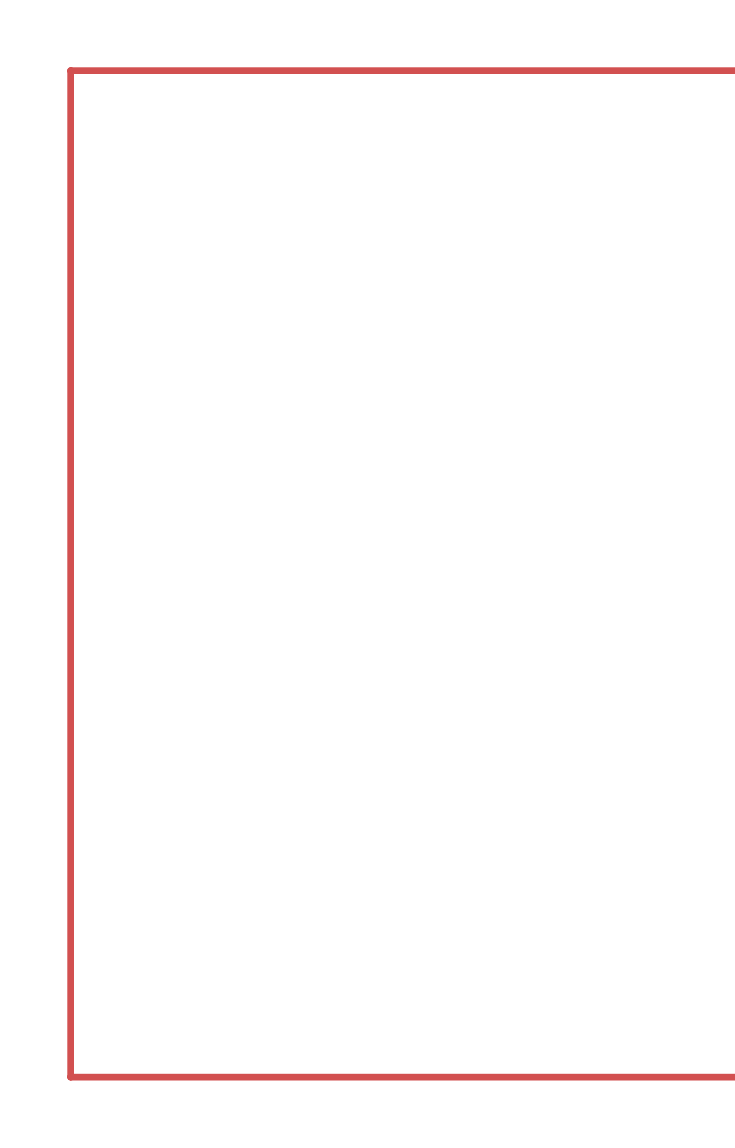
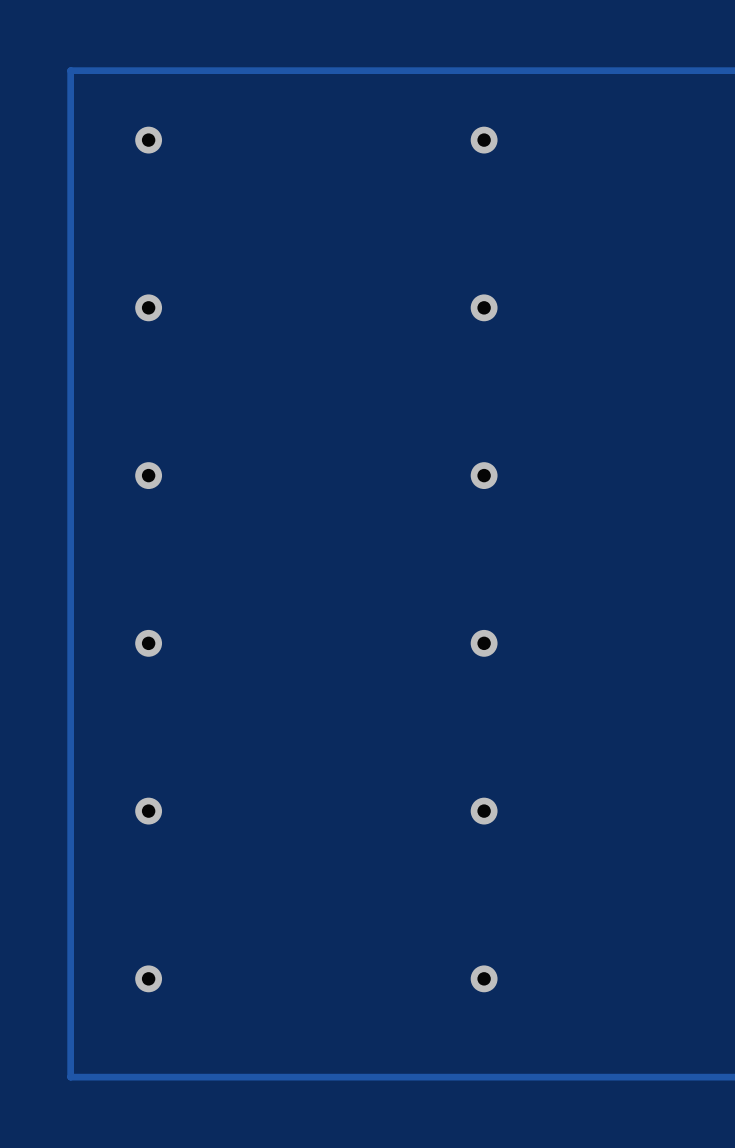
via: none -> (148, 140)
via: none -> (484, 140)
via: none -> (148, 307)
via: none -> (484, 307)
via: none -> (148, 475)
via: none -> (484, 475)
via: none -> (148, 643)
via: none -> (484, 643)
via: none -> (148, 811)
via: none -> (484, 811)
via: none -> (148, 978)
via: none -> (484, 978)

